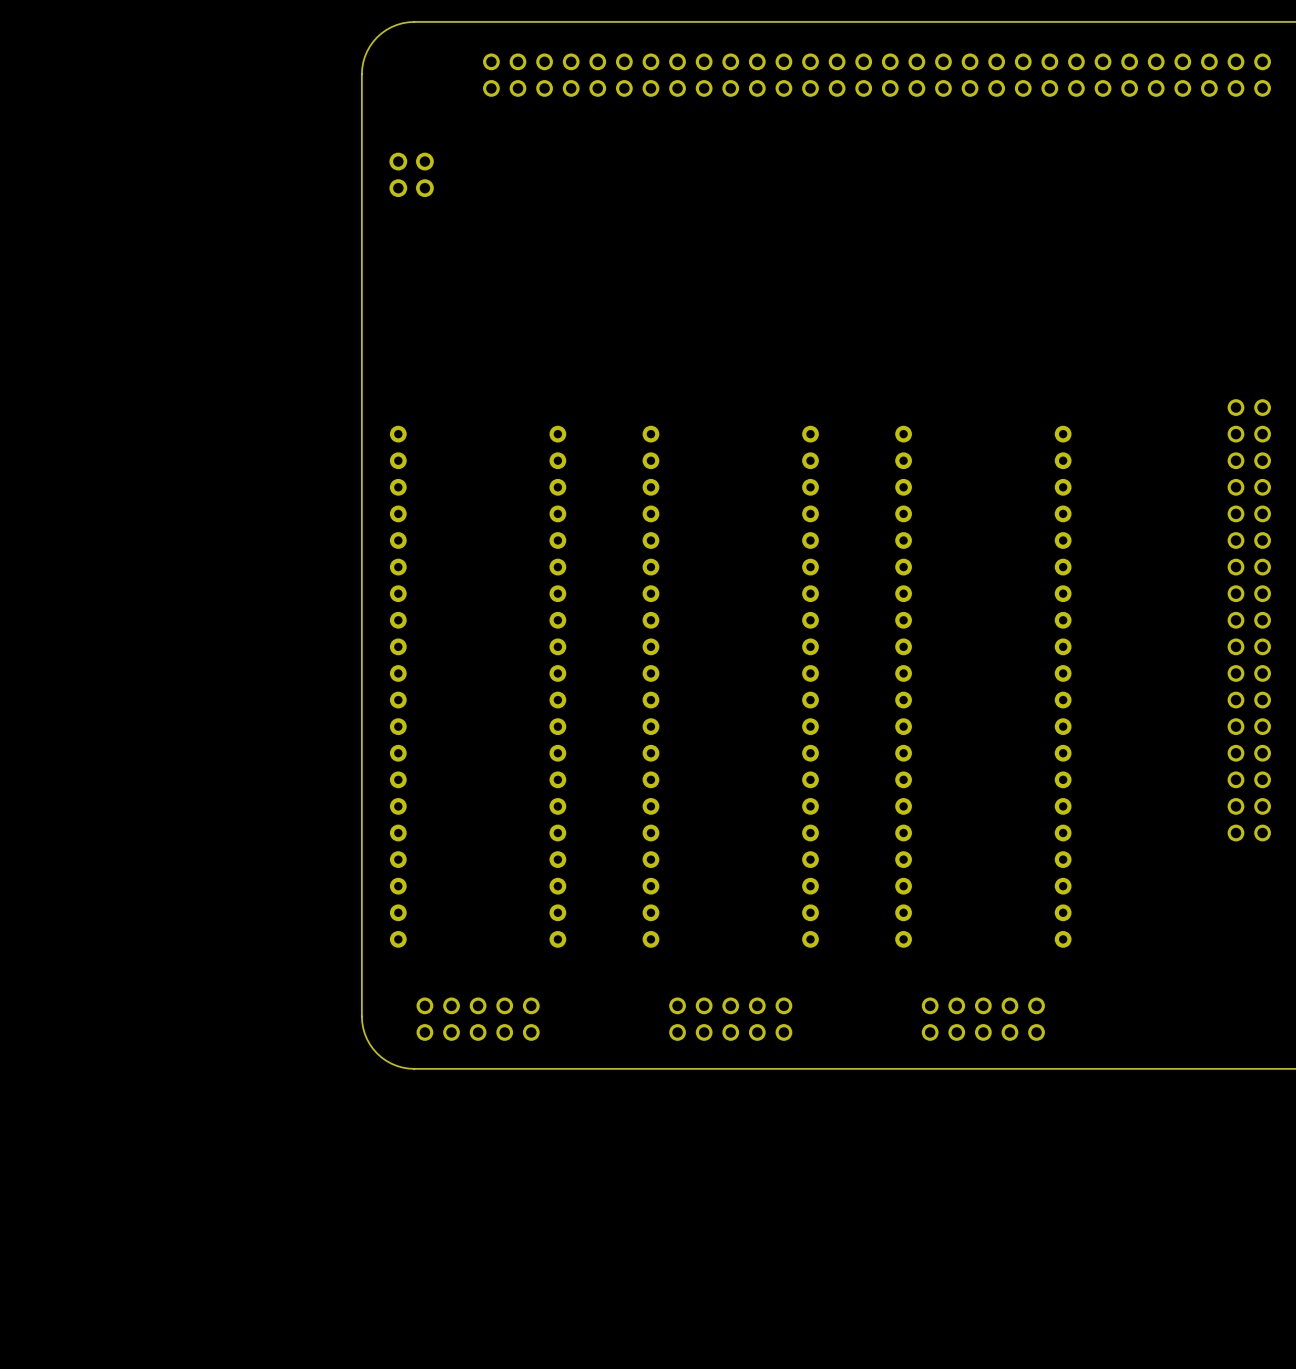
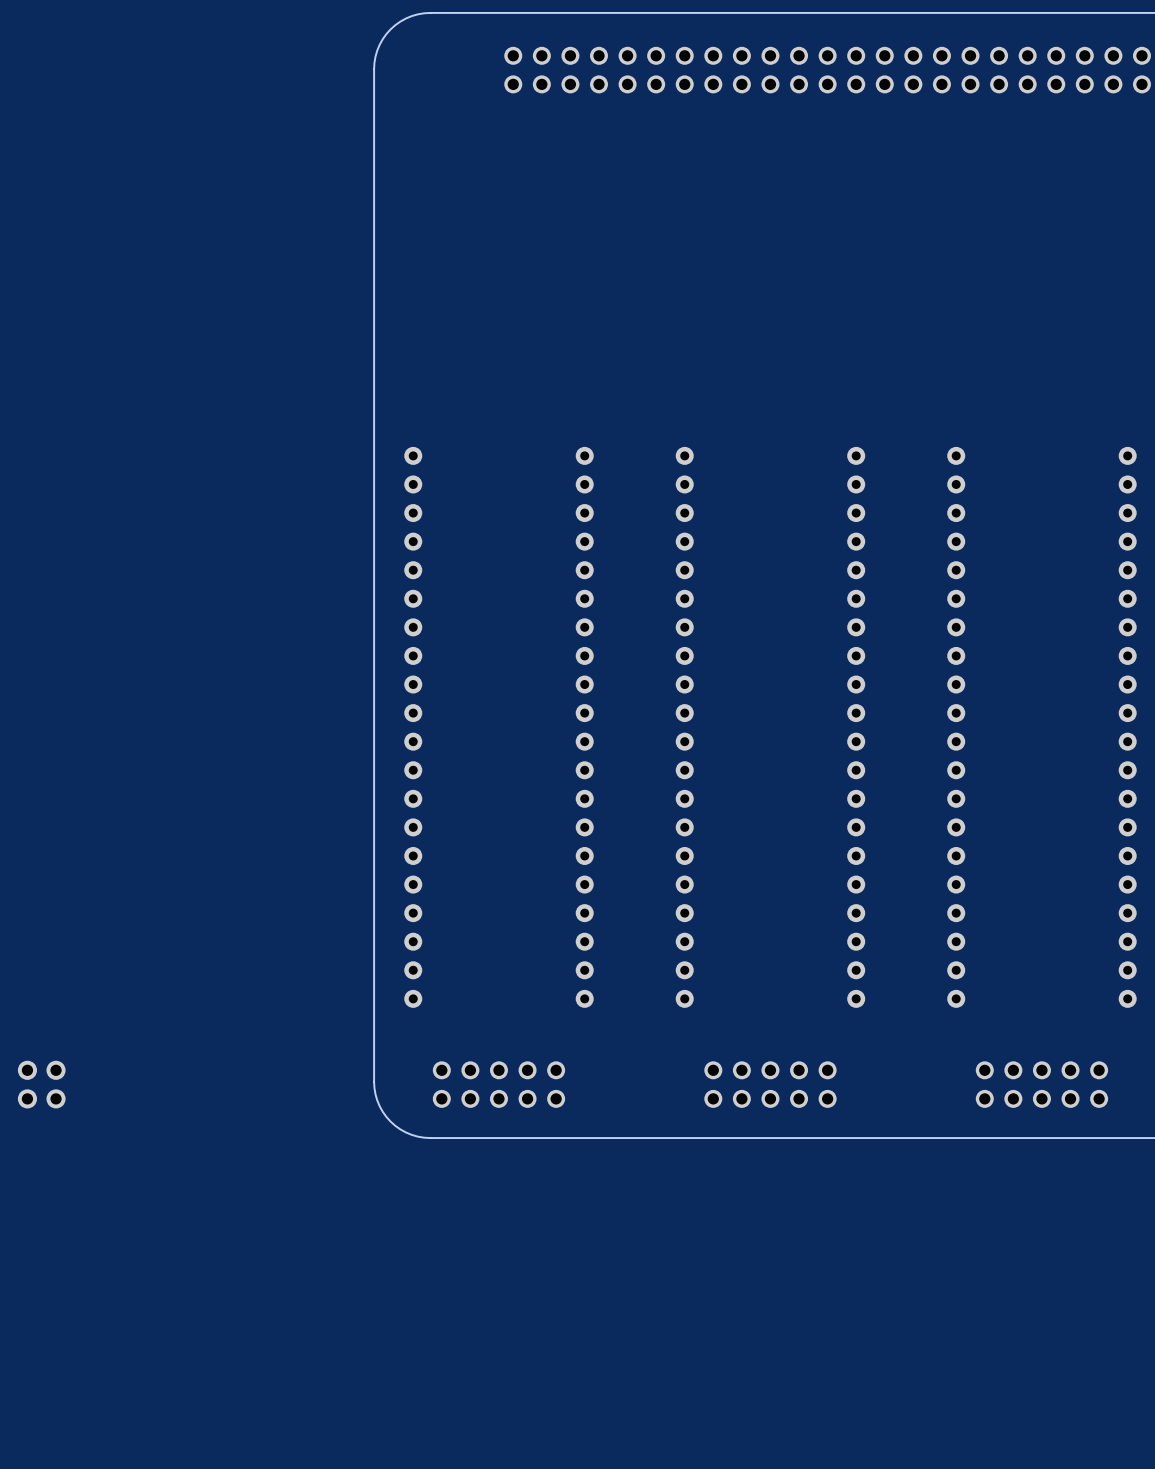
part: (411, 174) -> none
part: none -> (41, 1084)

